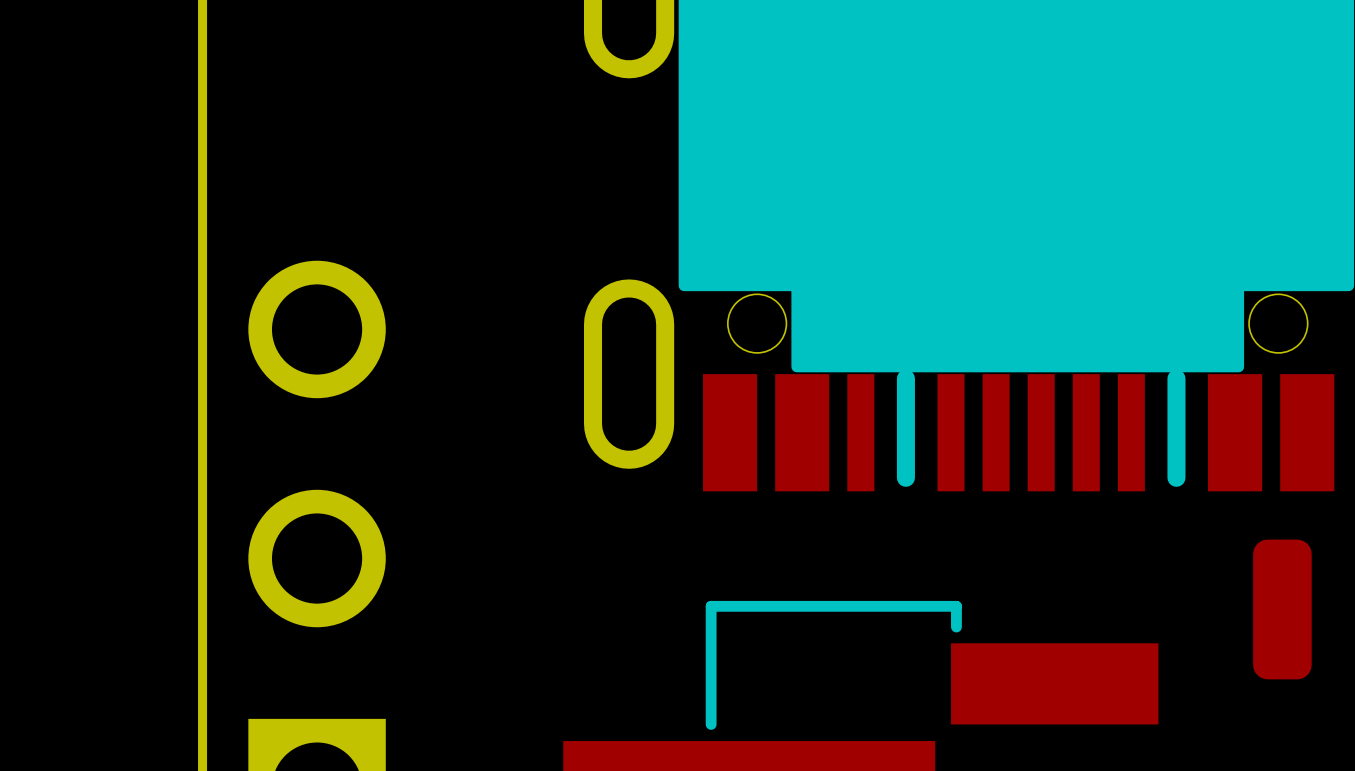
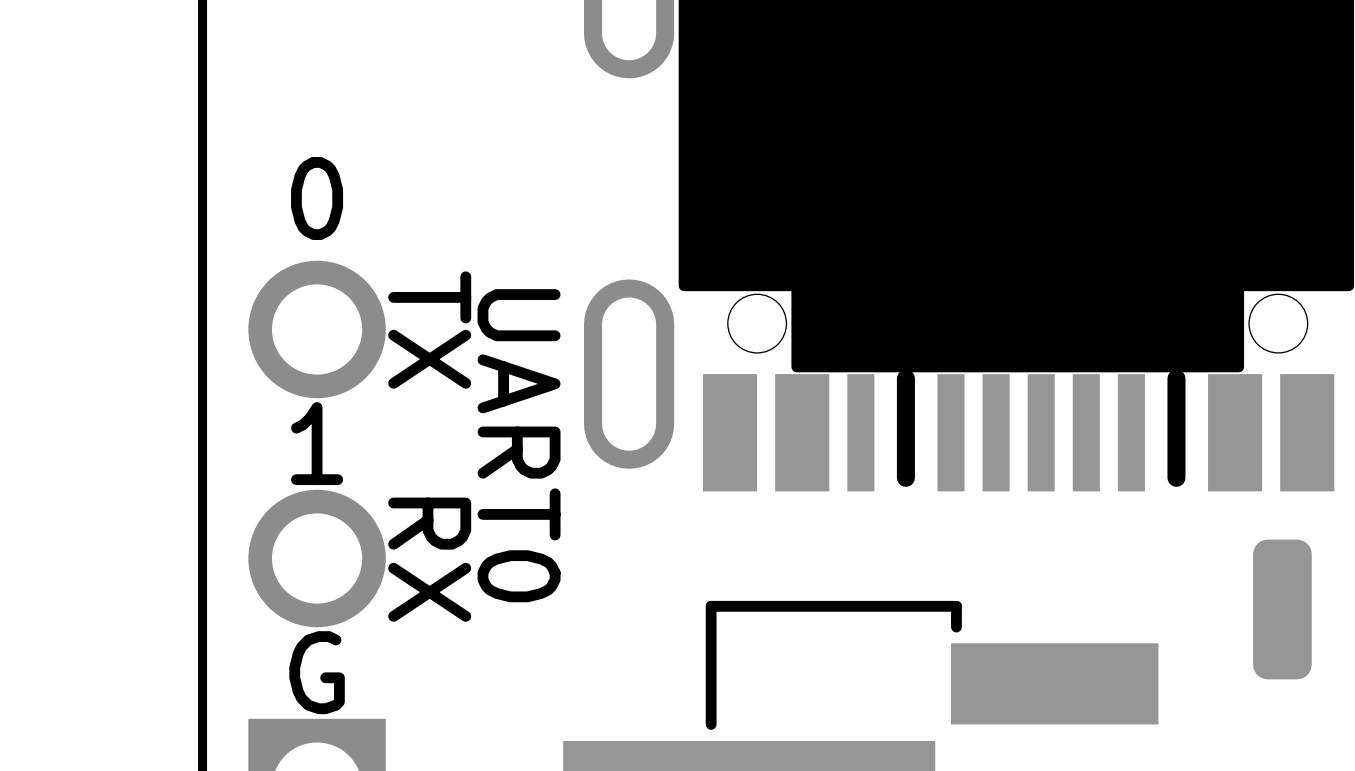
text: none -> 0 (317, 198)
text: none -> TX (429, 330)
text: none -> 1 (317, 443)
text: none -> UART0 (519, 445)
text: none -> RX (429, 559)
text: none -> G (317, 672)

